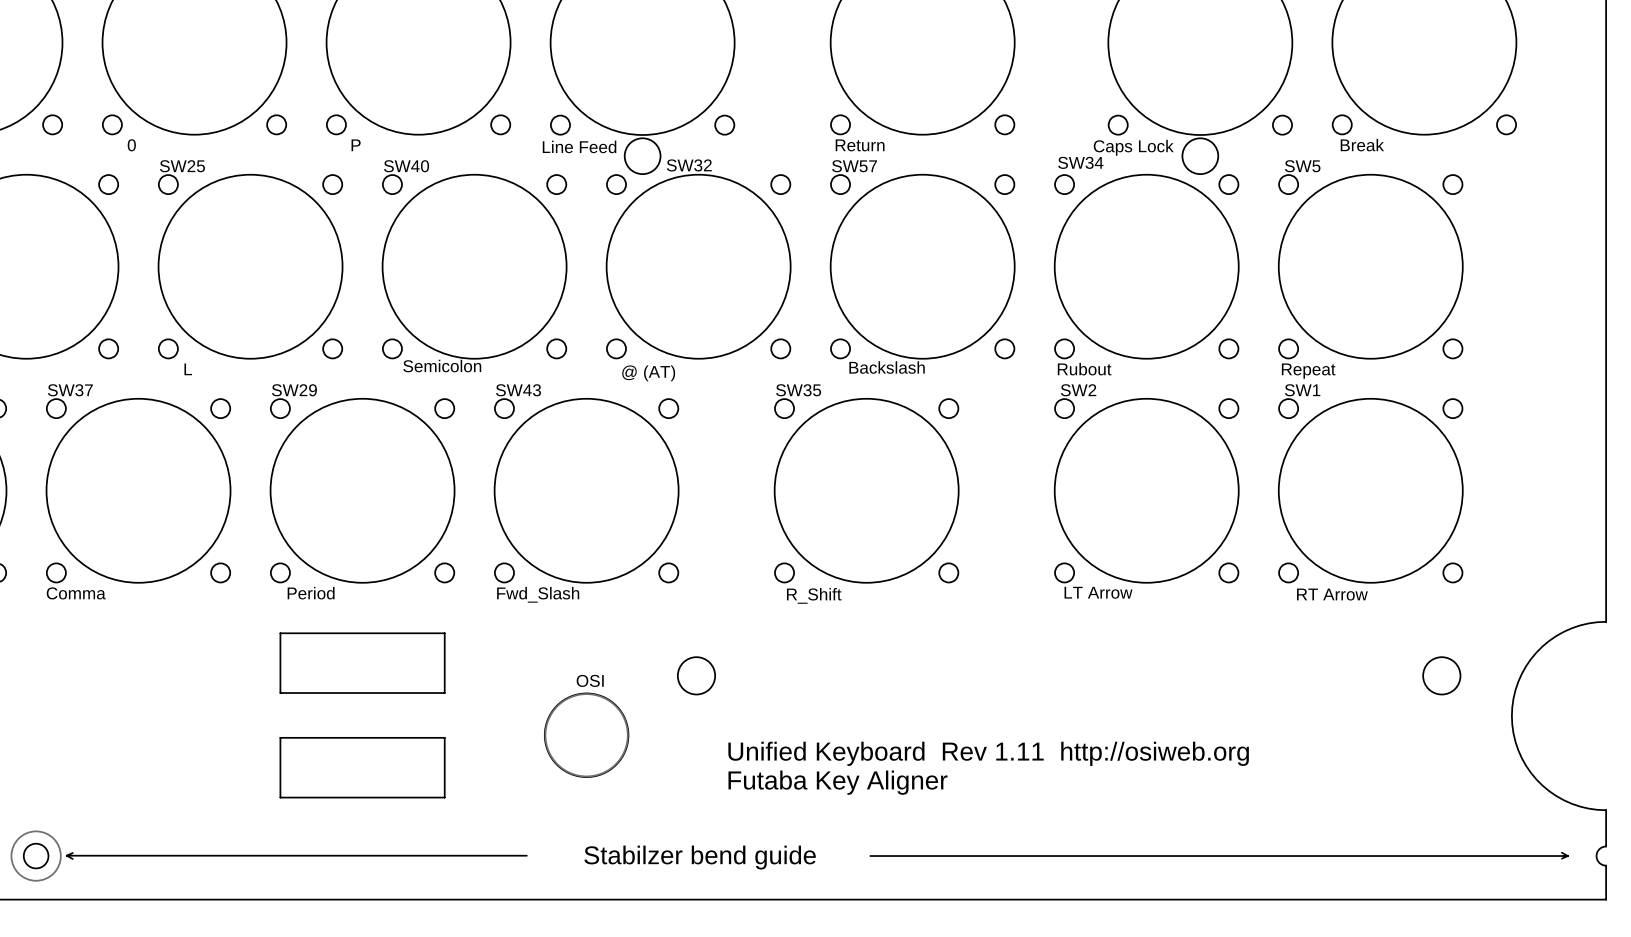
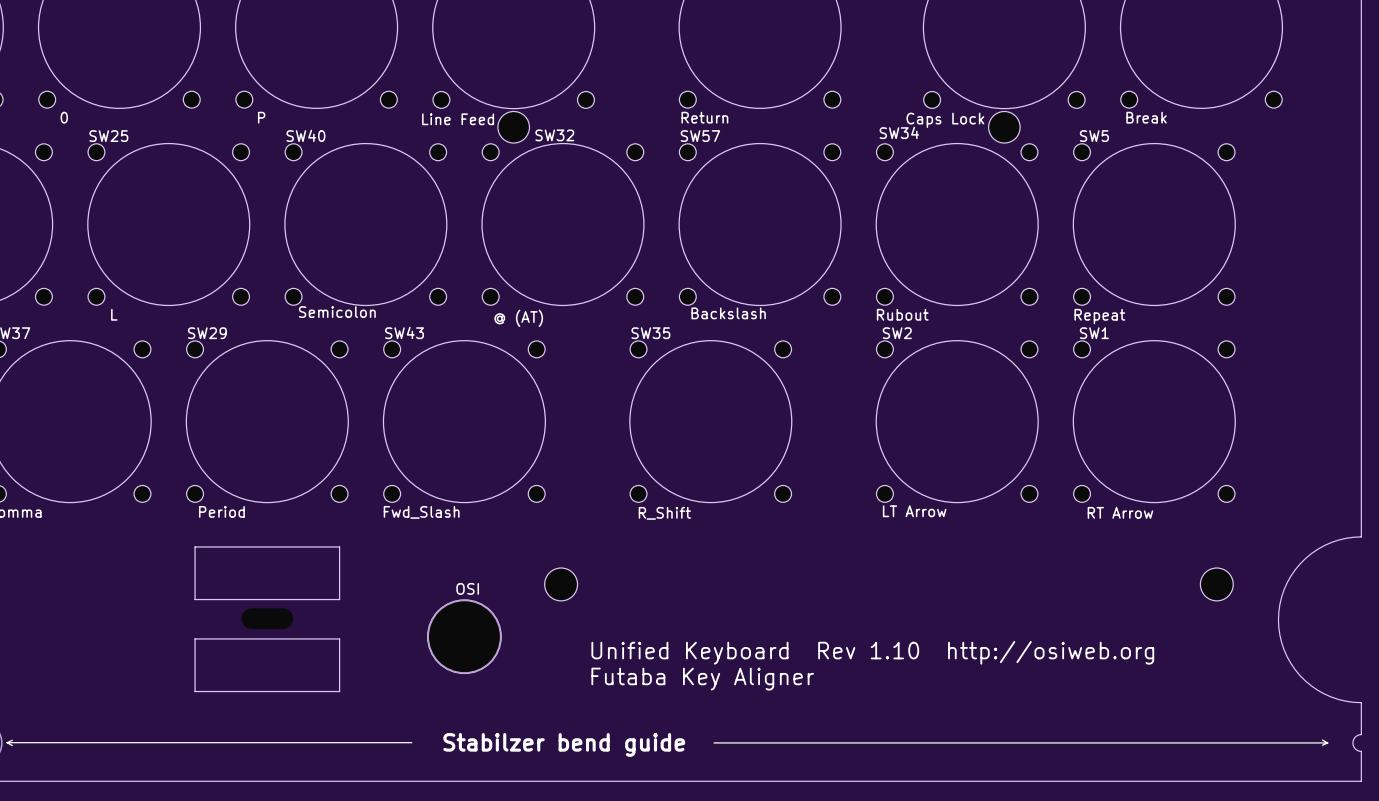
text: Unified Keyboard Rev 1.11 http://osiweb.org (988, 753) -> Unified Keyboard Rev 1.10 http://osiweb.org (872, 652)

